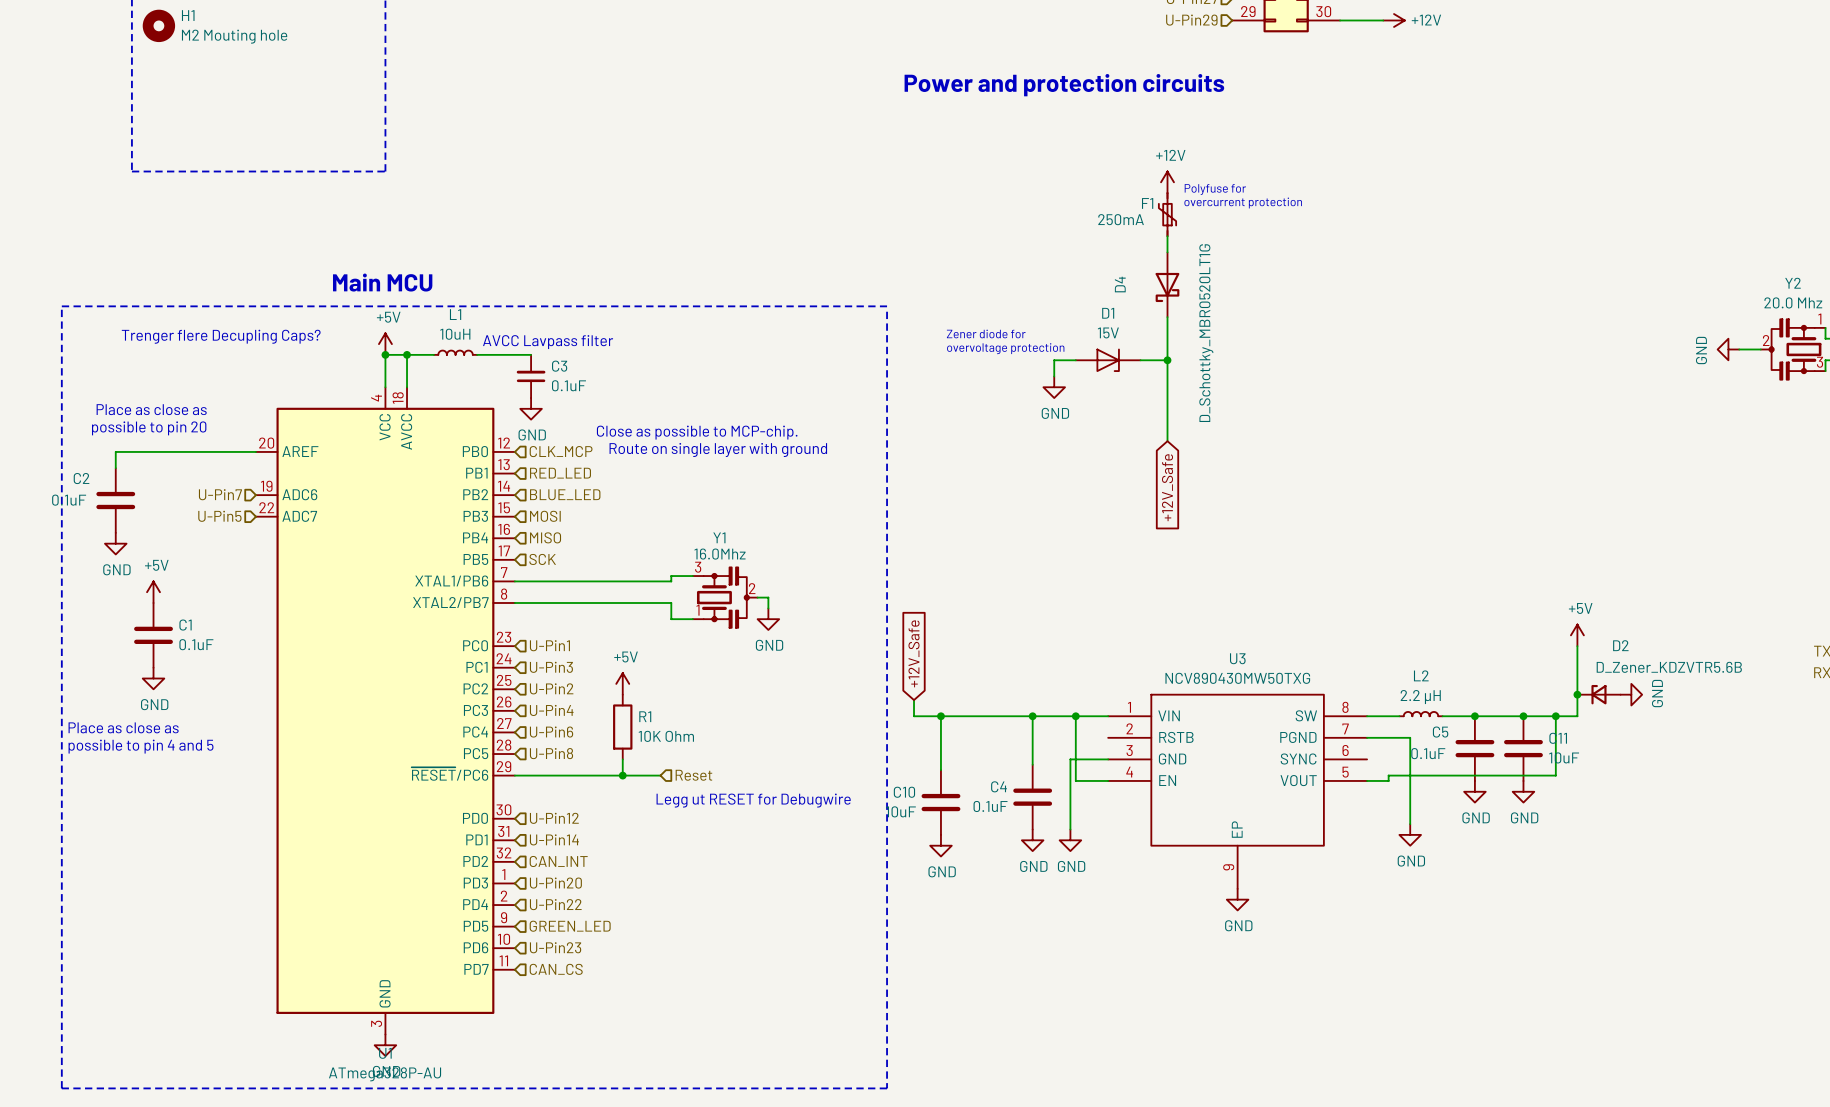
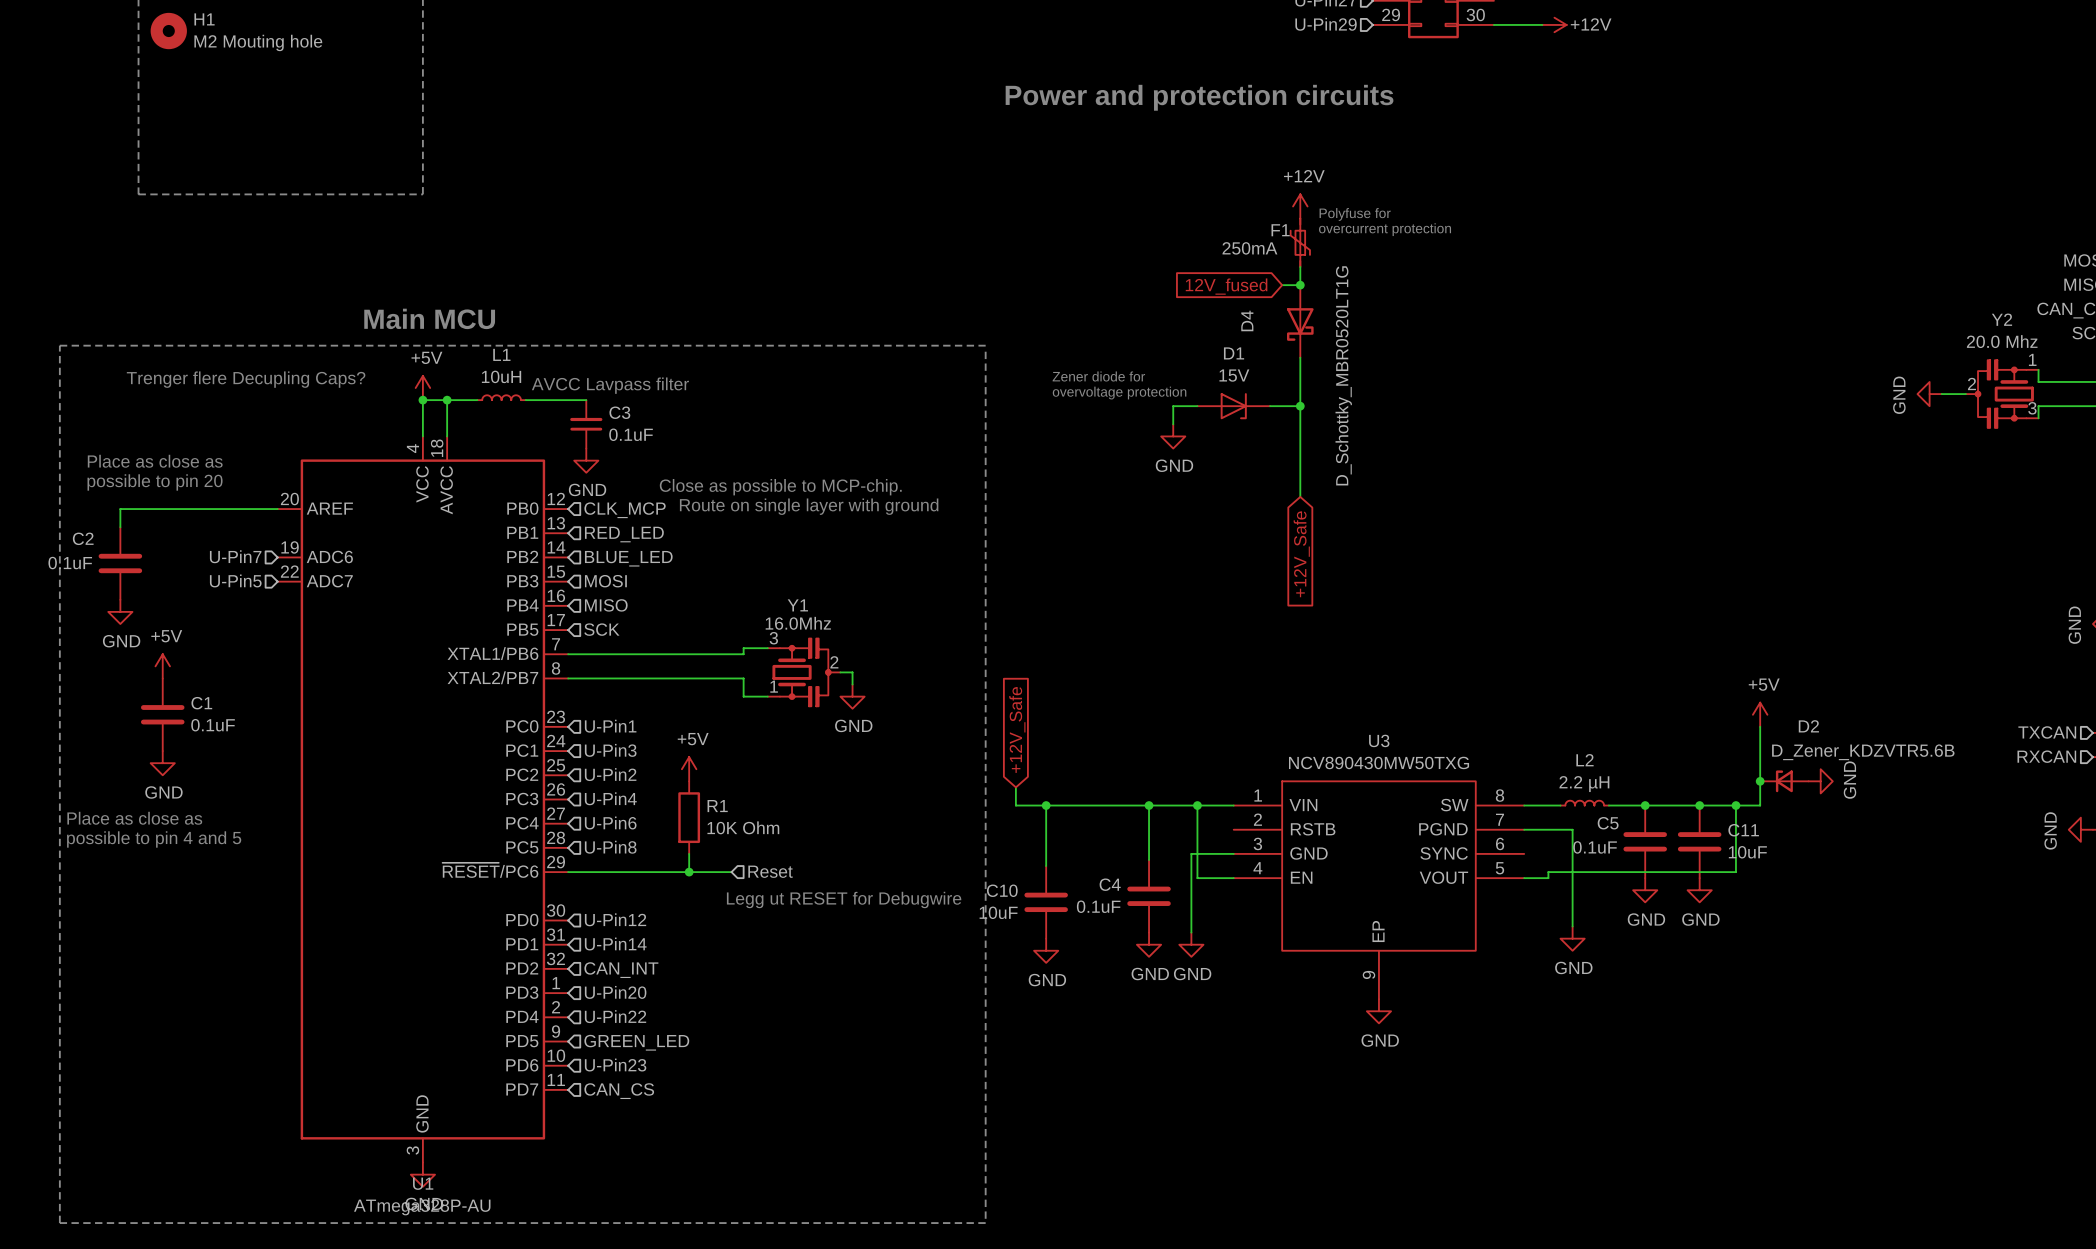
global label: none -> 12V_fused (1226, 286)
wire: none -> (1282, 285) (1300, 285)
junction: none -> (1300, 285)

